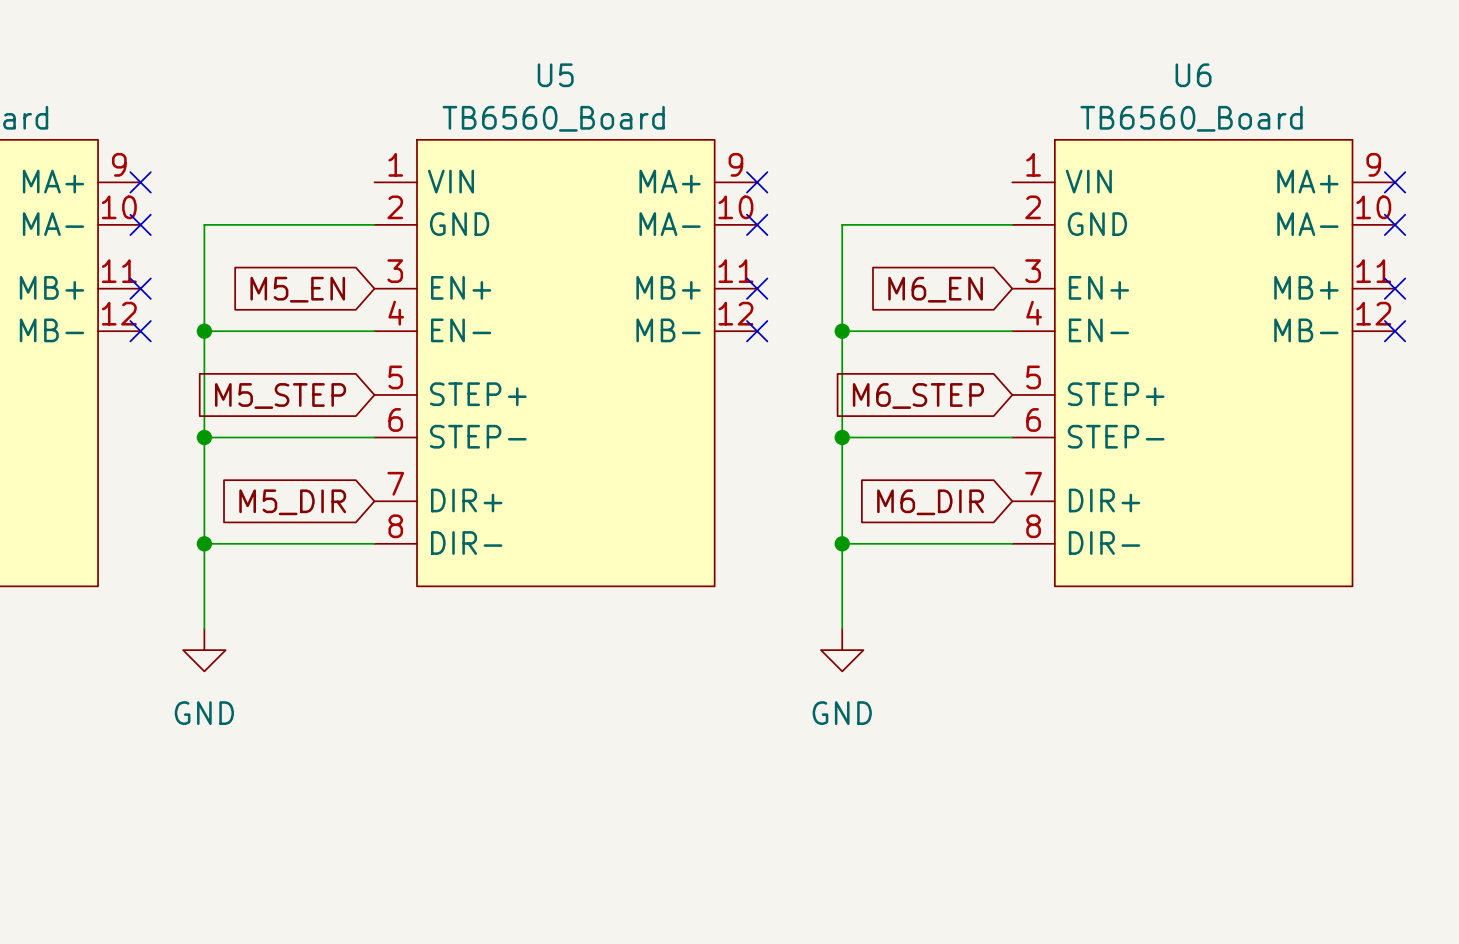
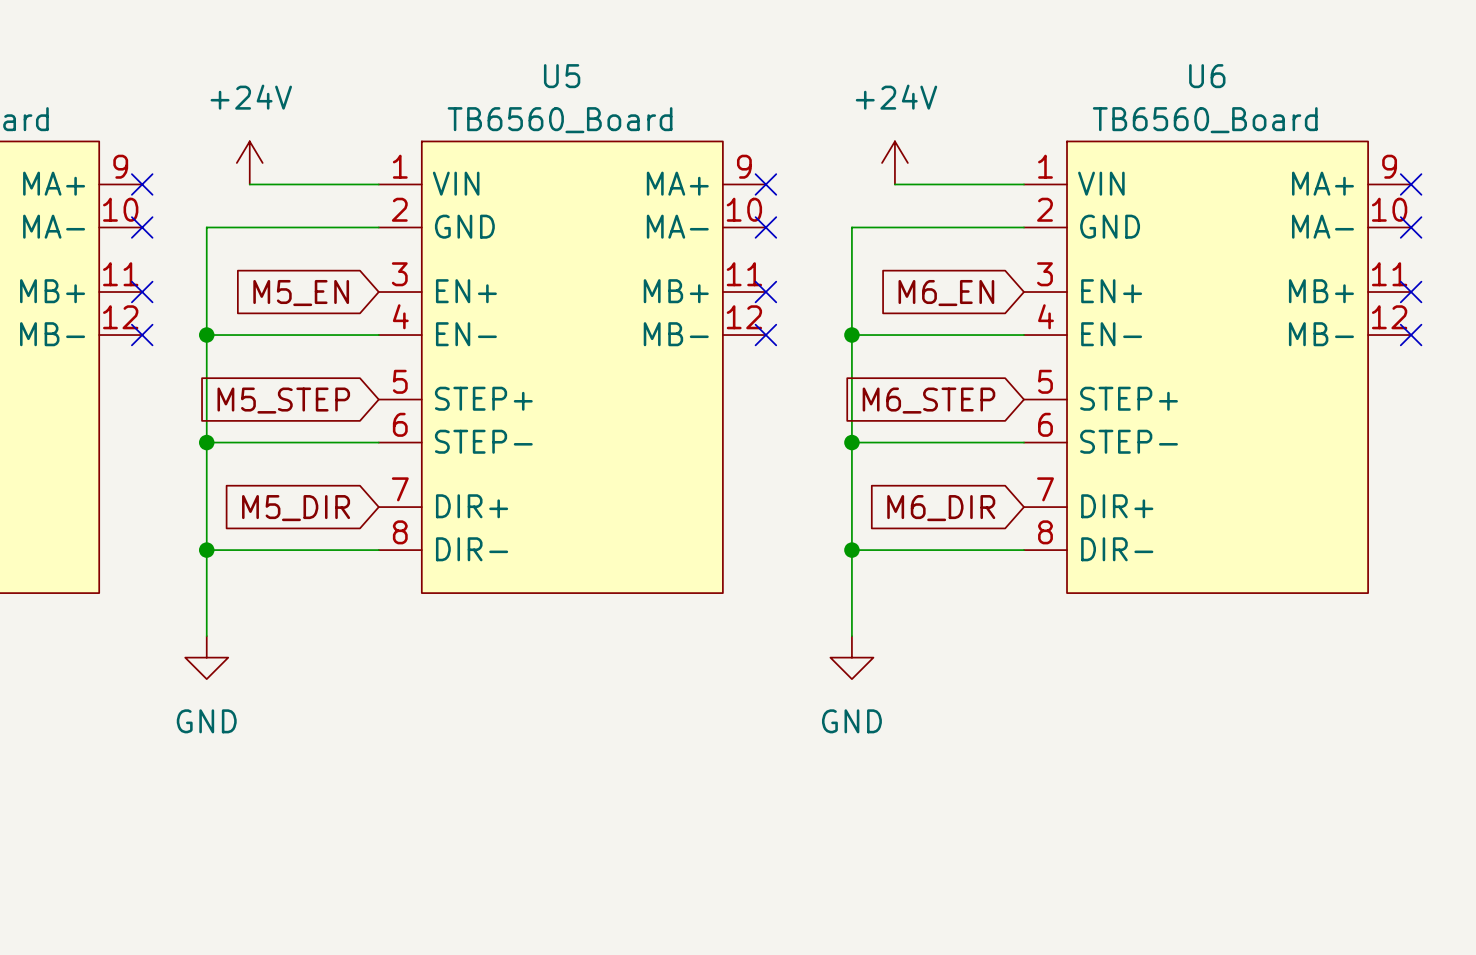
power symbol: none -> +24V (249, 162)
power symbol: none -> +24V (894, 162)
wire: none -> (249, 184) (378, 184)
wire: none -> (894, 184) (1023, 184)

